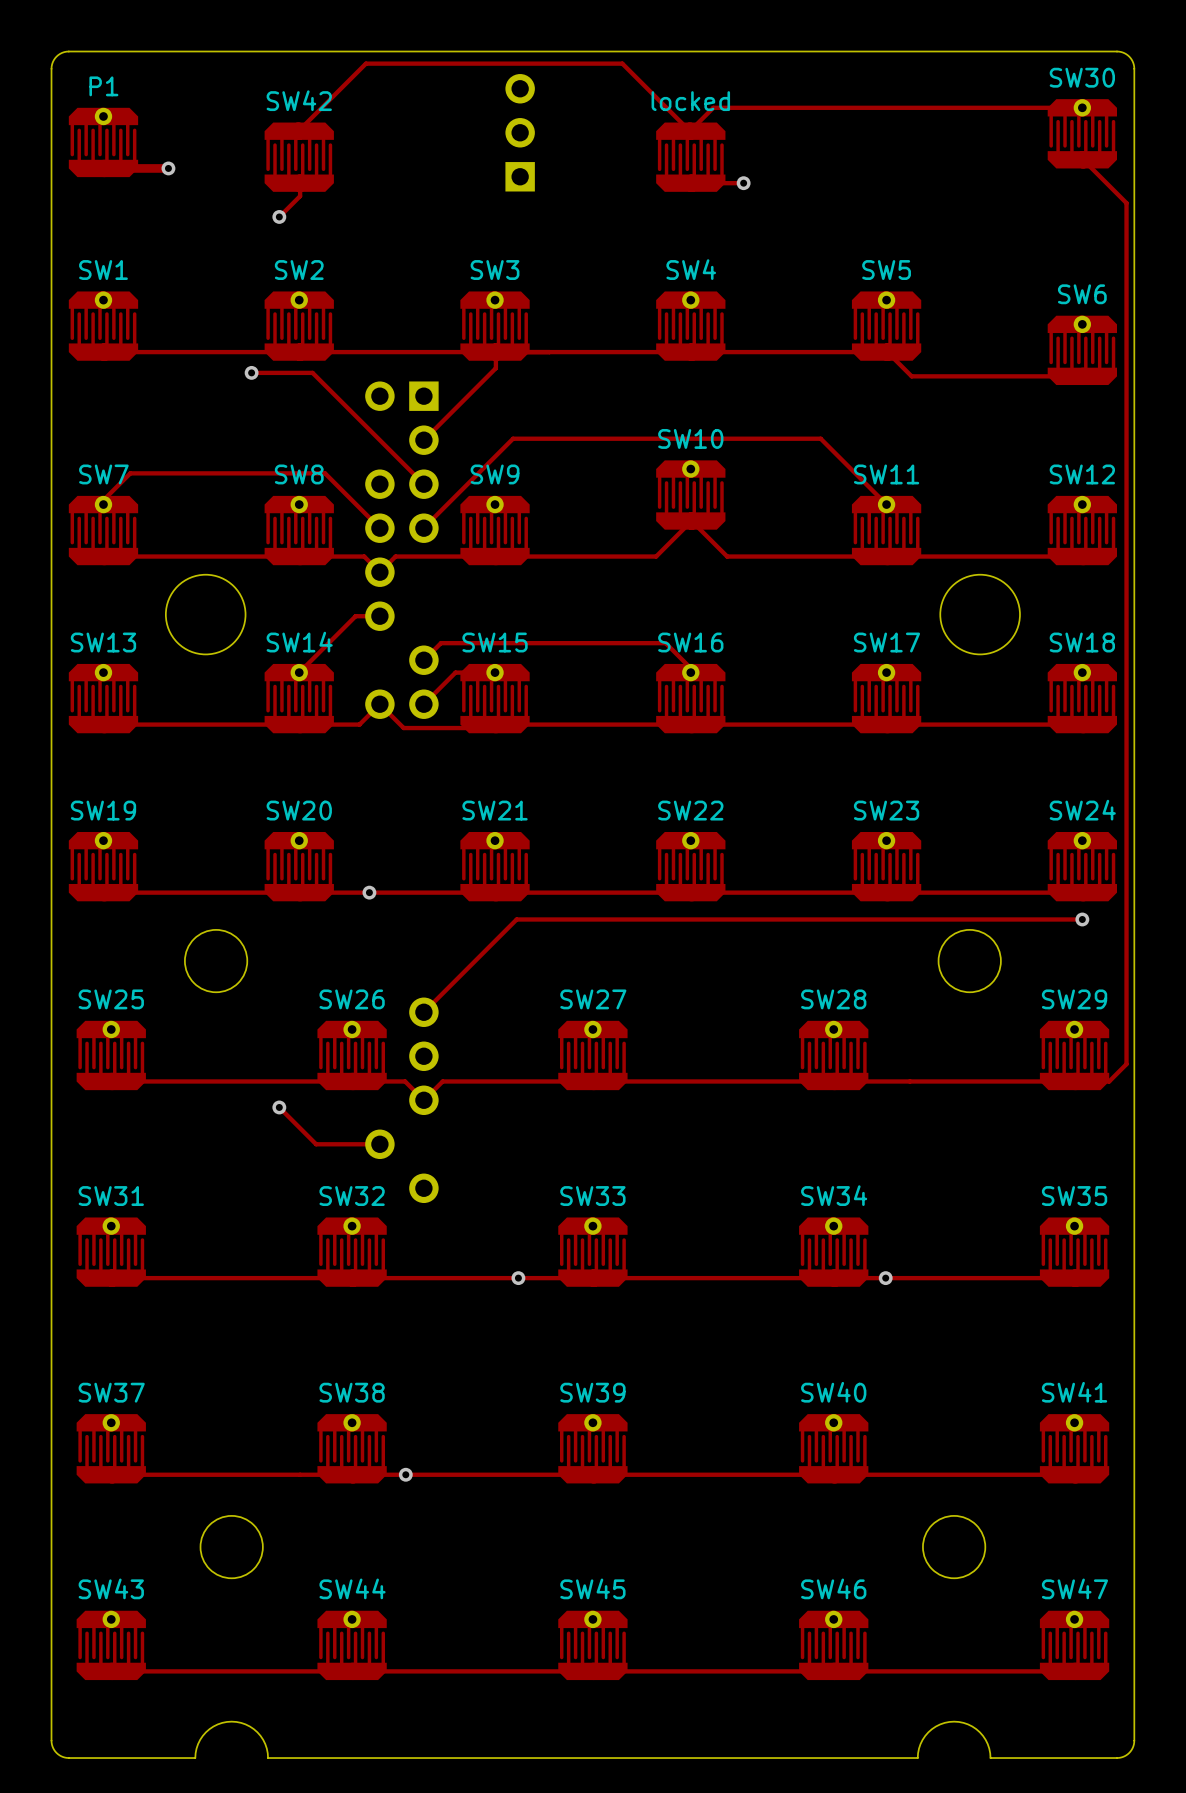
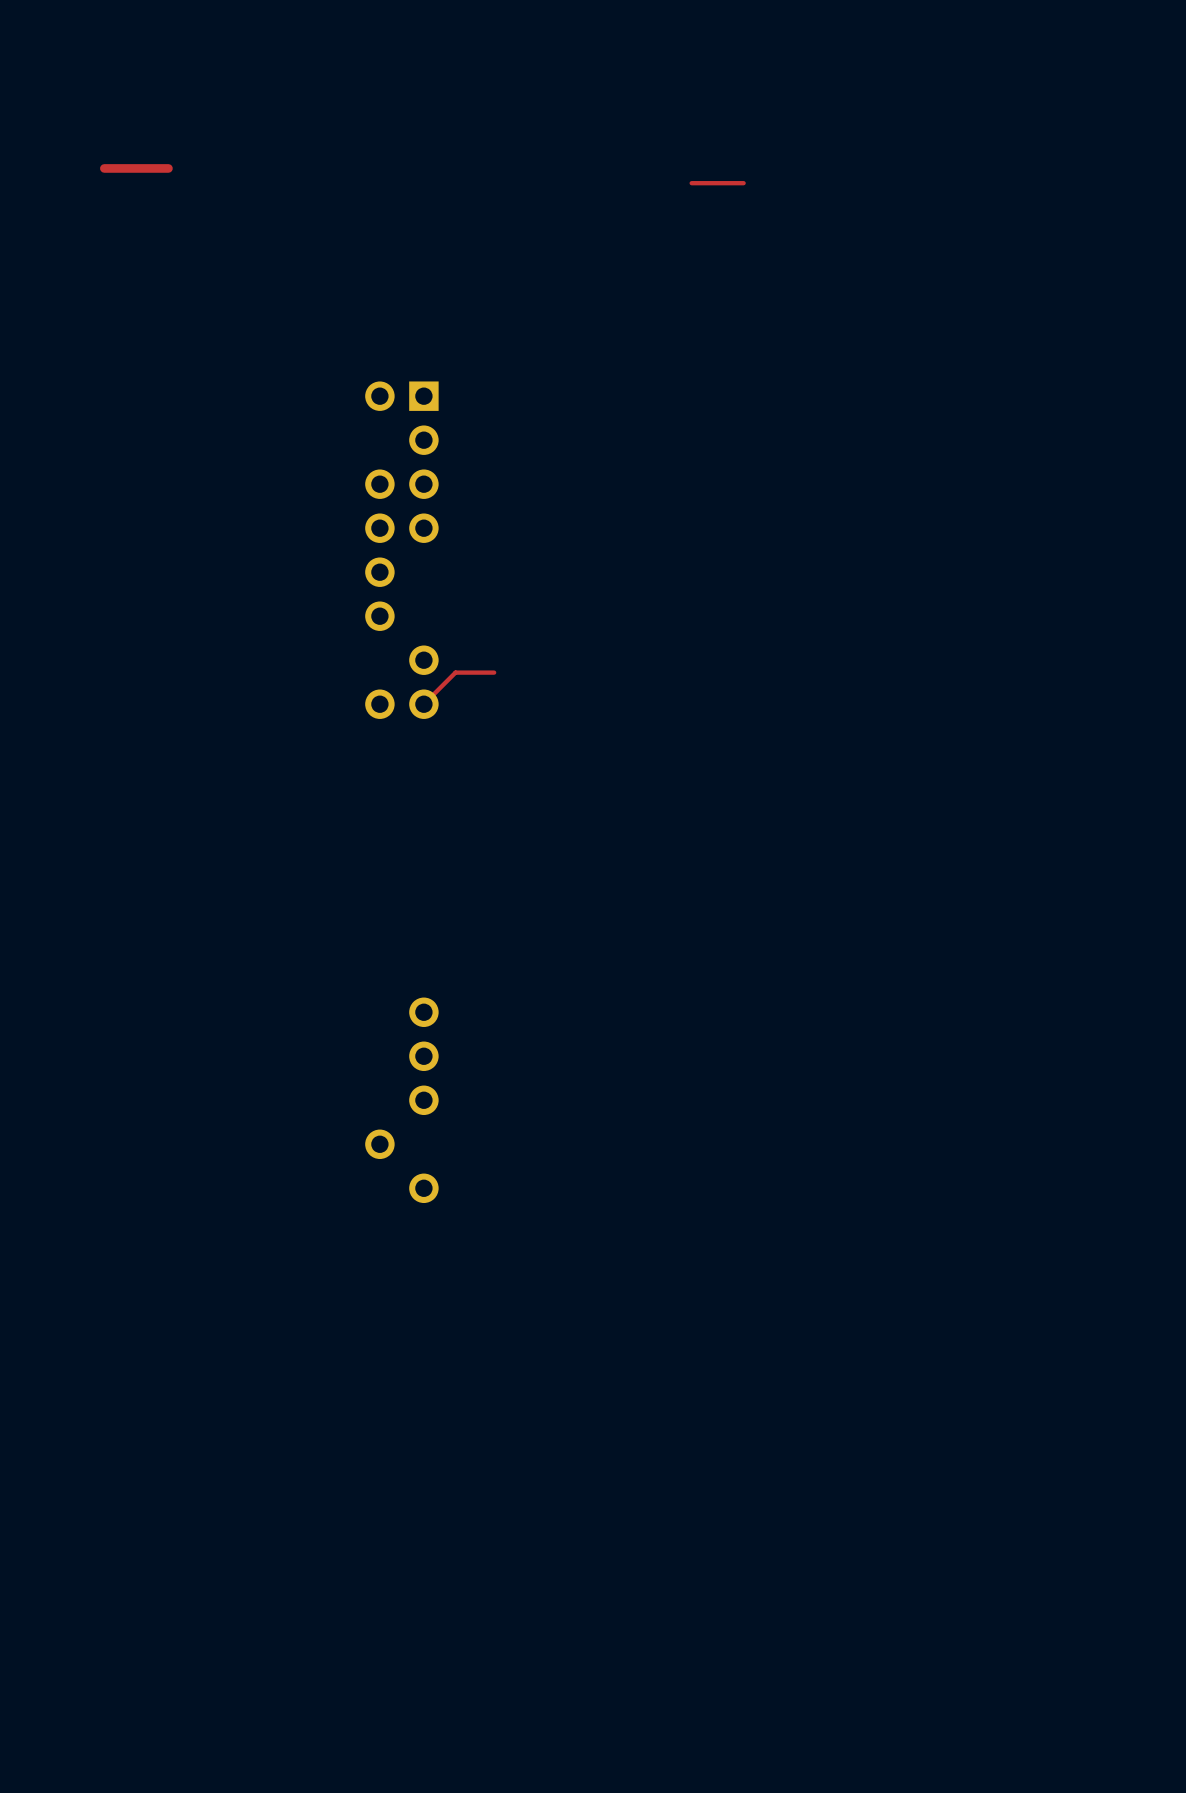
board edge: (68, 51) (1116, 51) (1124, 53) (1131, 59) (1134, 68) (1134, 1740) (1132, 1748) (1126, 1755) (1116, 1758) (990, 1758) (987, 1744) (979, 1732) (968, 1724) (954, 1721) (940, 1724) (928, 1732) (920, 1744) (917, 1758) (268, 1758) (265, 1744) (257, 1732) (245, 1724) (231, 1721) (217, 1724) (205, 1732) (198, 1744) (195, 1758) (66, 1757) (59, 1755) (54, 1749) (51, 1740) (51, 68) (56, 56) (68, 51) -> none
track: (1081, 107) (713, 107) (689, 131) (622, 63) (365, 63) (298, 131) -> none
part: (520, 132) -> none
SW30: (1082, 133) -> none
P1: (103, 142) -> none
SW42: (299, 157) -> none
locked: (690, 157) -> none
track: (1083, 159) (1126, 203) (1126, 1064) (1109, 1081) (442, 1081) (423, 1100) (405, 1081) (112, 1081) -> none
via: (168, 168) -> none
track: (300, 183) (300, 196) (279, 216) -> none
via: (743, 183) -> none
via: (279, 216) -> none
SW1: (103, 326) -> none
SW2: (299, 326) -> none
SW3: (495, 326) -> none
SW4: (690, 326) -> none
SW5: (886, 326) -> none
SW6: (1082, 350) -> none
track: (104, 352) (887, 352) (911, 376) (1083, 376) -> none
track: (495, 352) (495, 368) (423, 440) -> none
track: (251, 372) (312, 372) (423, 484) -> none
via: (251, 372) -> none
SW10: (690, 495) -> none
track: (103, 500) (130, 473) (325, 473) (379, 528) -> none
track: (886, 504) (820, 438) (513, 438) (423, 527) -> none
SW7: (103, 530) -> none
SW8: (299, 530) -> none
SW9: (495, 530) -> none
SW11: (886, 530) -> none
SW12: (1082, 530) -> none
track: (104, 556) (364, 556) (379, 572) (395, 556) (656, 556) (691, 521) (727, 556) (1083, 556) -> none
round board edge: [164, 573, 247, 656] -> none
round board edge: [939, 573, 1021, 656] -> none
track: (379, 616) (355, 616) (299, 672) -> none
track: (423, 660) (440, 643) (665, 643) (690, 668) -> none
SW13: (103, 698) -> none
SW14: (299, 698) -> none
SW15: (495, 698) -> none
SW16: (690, 698) -> none
SW17: (886, 698) -> none
SW18: (1082, 698) -> none
track: (104, 724) (359, 724) (379, 704) (403, 728) (492, 728) (495, 724) (1083, 724) -> none
SW19: (103, 866) -> none
SW20: (299, 866) -> none
SW21: (495, 866) -> none
SW22: (690, 866) -> none
SW23: (886, 866) -> none
SW24: (1082, 866) -> none
track: (104, 892) (1083, 892) -> none
via: (369, 892) -> none
track: (1082, 919) (516, 919) (423, 1012) -> none
via: (1082, 919) -> none
round board edge: [184, 929, 249, 994] -> none
round board edge: [937, 929, 1002, 994] -> none
SW25: (111, 1055) -> none
SW26: (352, 1055) -> none
SW27: (592, 1055) -> none
SW28: (833, 1055) -> none
SW29: (1074, 1055) -> none
track: (279, 1107) (316, 1144) (379, 1144) -> none
via: (279, 1107) -> none
SW31: (111, 1252) -> none
SW32: (352, 1252) -> none
SW33: (592, 1252) -> none
SW34: (833, 1252) -> none
SW35: (1074, 1252) -> none
track: (112, 1278) (1075, 1278) -> none
via: (518, 1278) -> none
via: (885, 1278) -> none
SW37: (111, 1448) -> none
SW38: (352, 1448) -> none
SW39: (592, 1448) -> none
SW40: (833, 1448) -> none
SW41: (1074, 1448) -> none
track: (112, 1474) (1075, 1474) -> none
via: (405, 1474) -> none
round board edge: [199, 1515, 264, 1580] -> none
round board edge: [922, 1515, 987, 1580] -> none
SW43: (111, 1645) -> none
SW44: (352, 1645) -> none
SW45: (592, 1645) -> none
SW46: (833, 1645) -> none
SW47: (1074, 1645) -> none
track: (112, 1671) (1075, 1671) -> none

